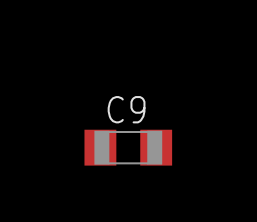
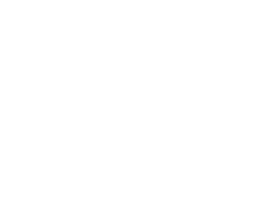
C9: (128, 147) -> none

